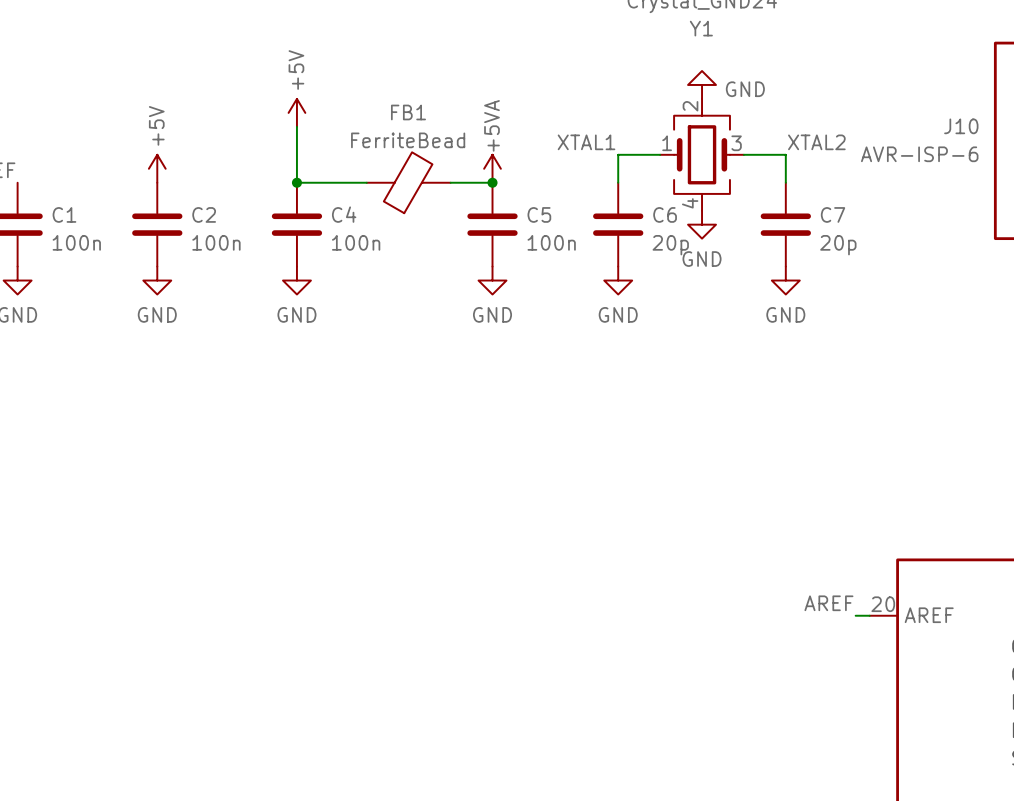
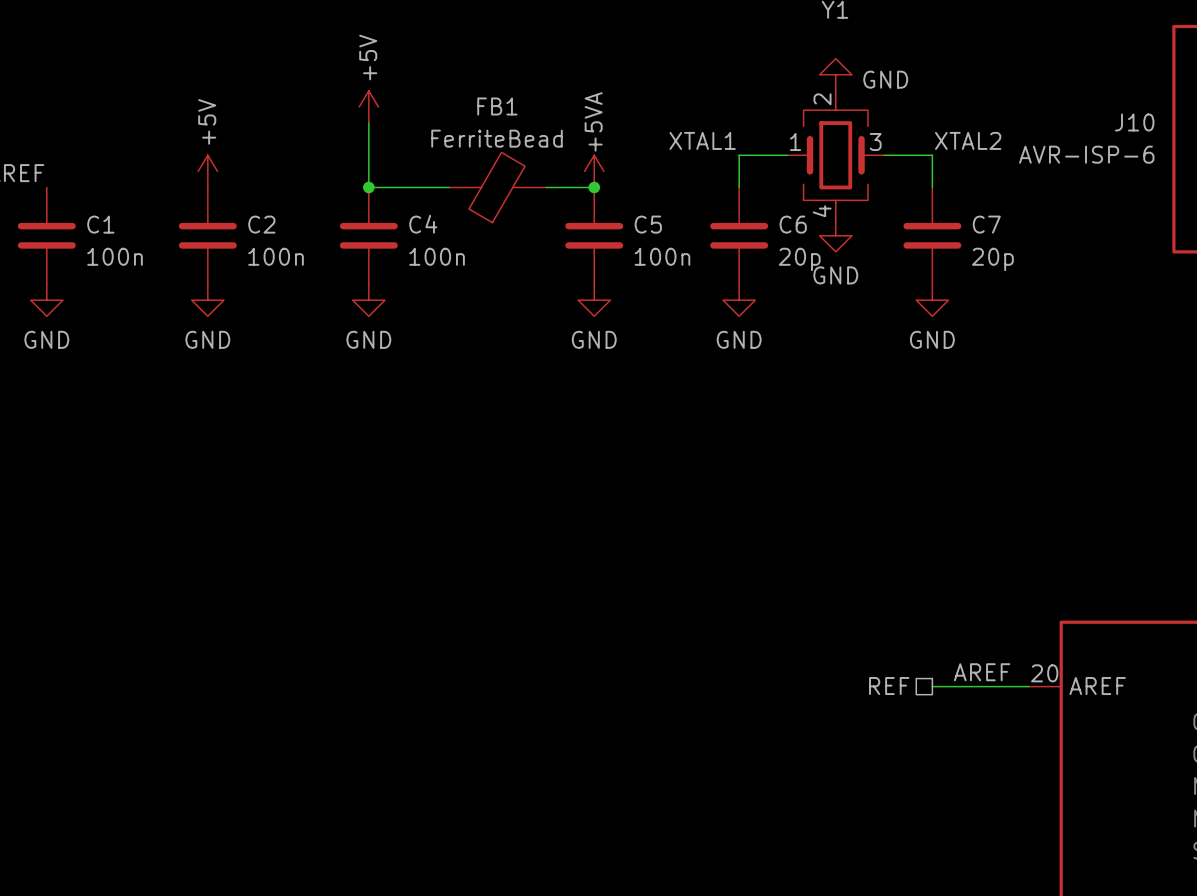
hierarchical label: none -> REF (889, 686)
wire: none -> (932, 686) (1012, 686)

